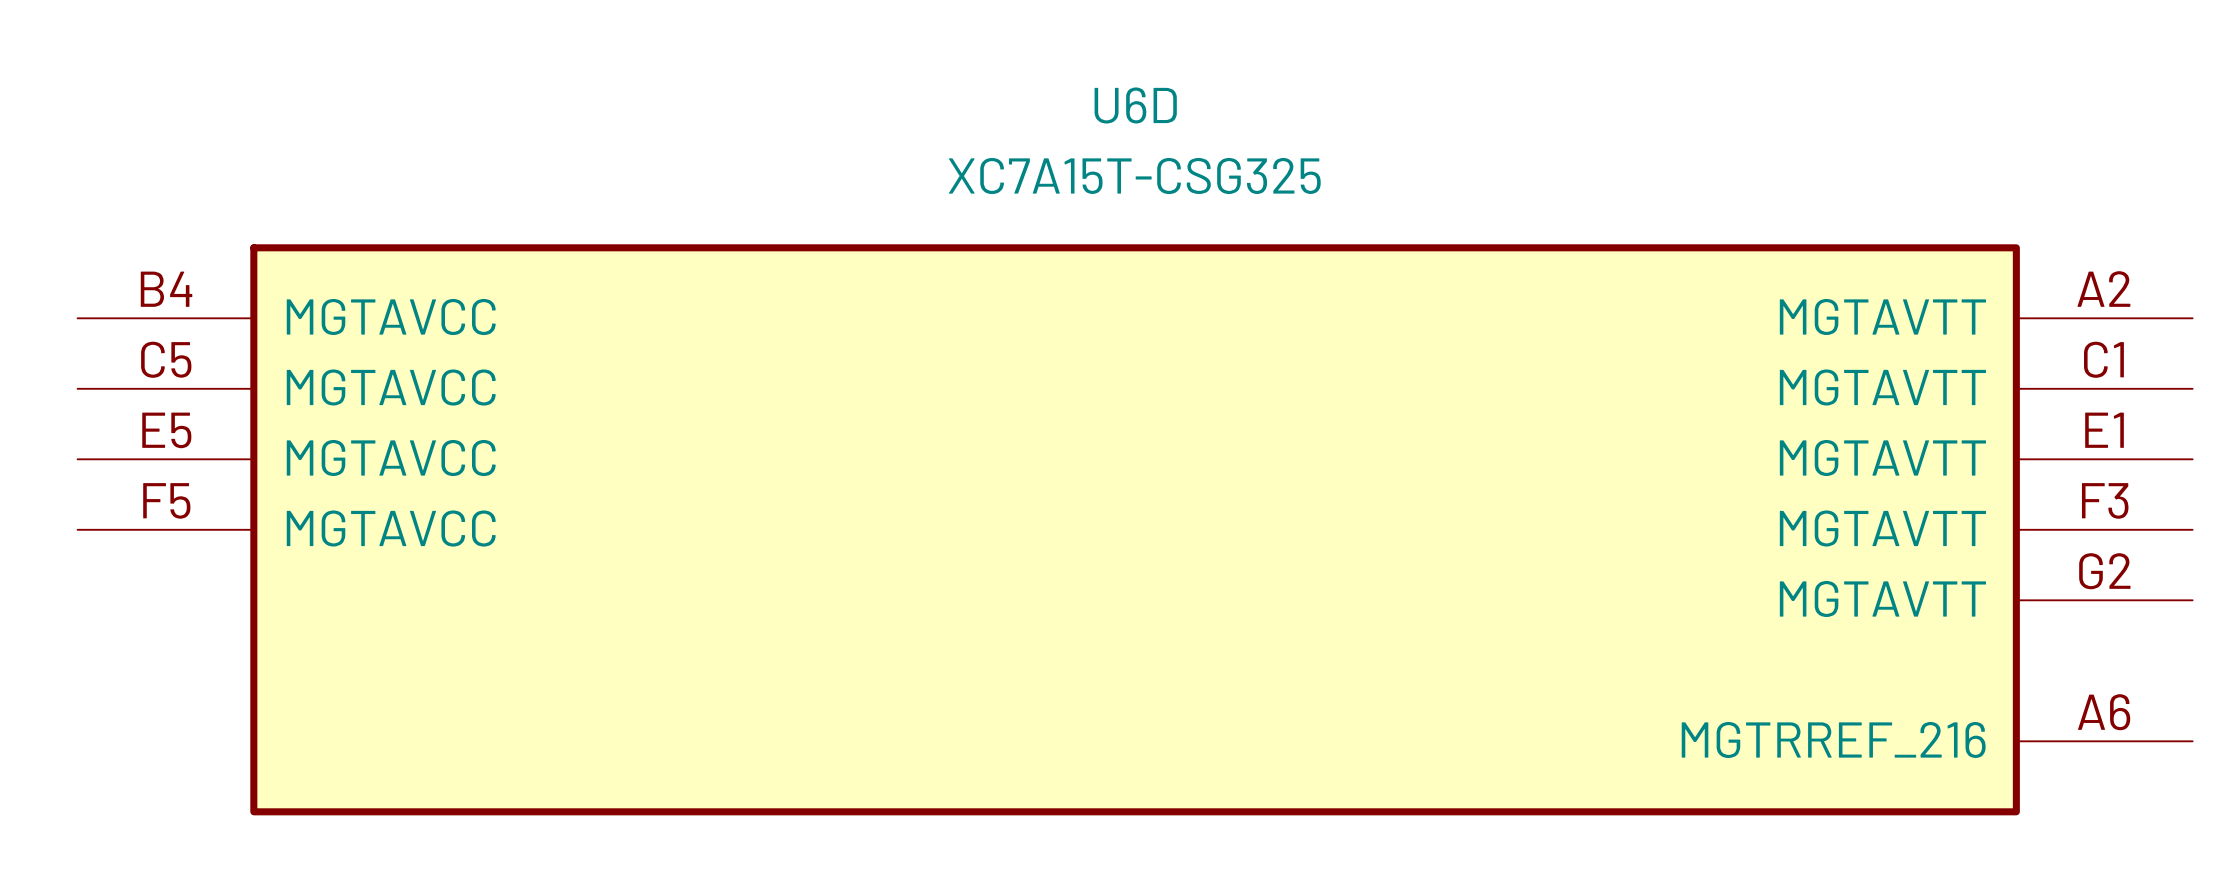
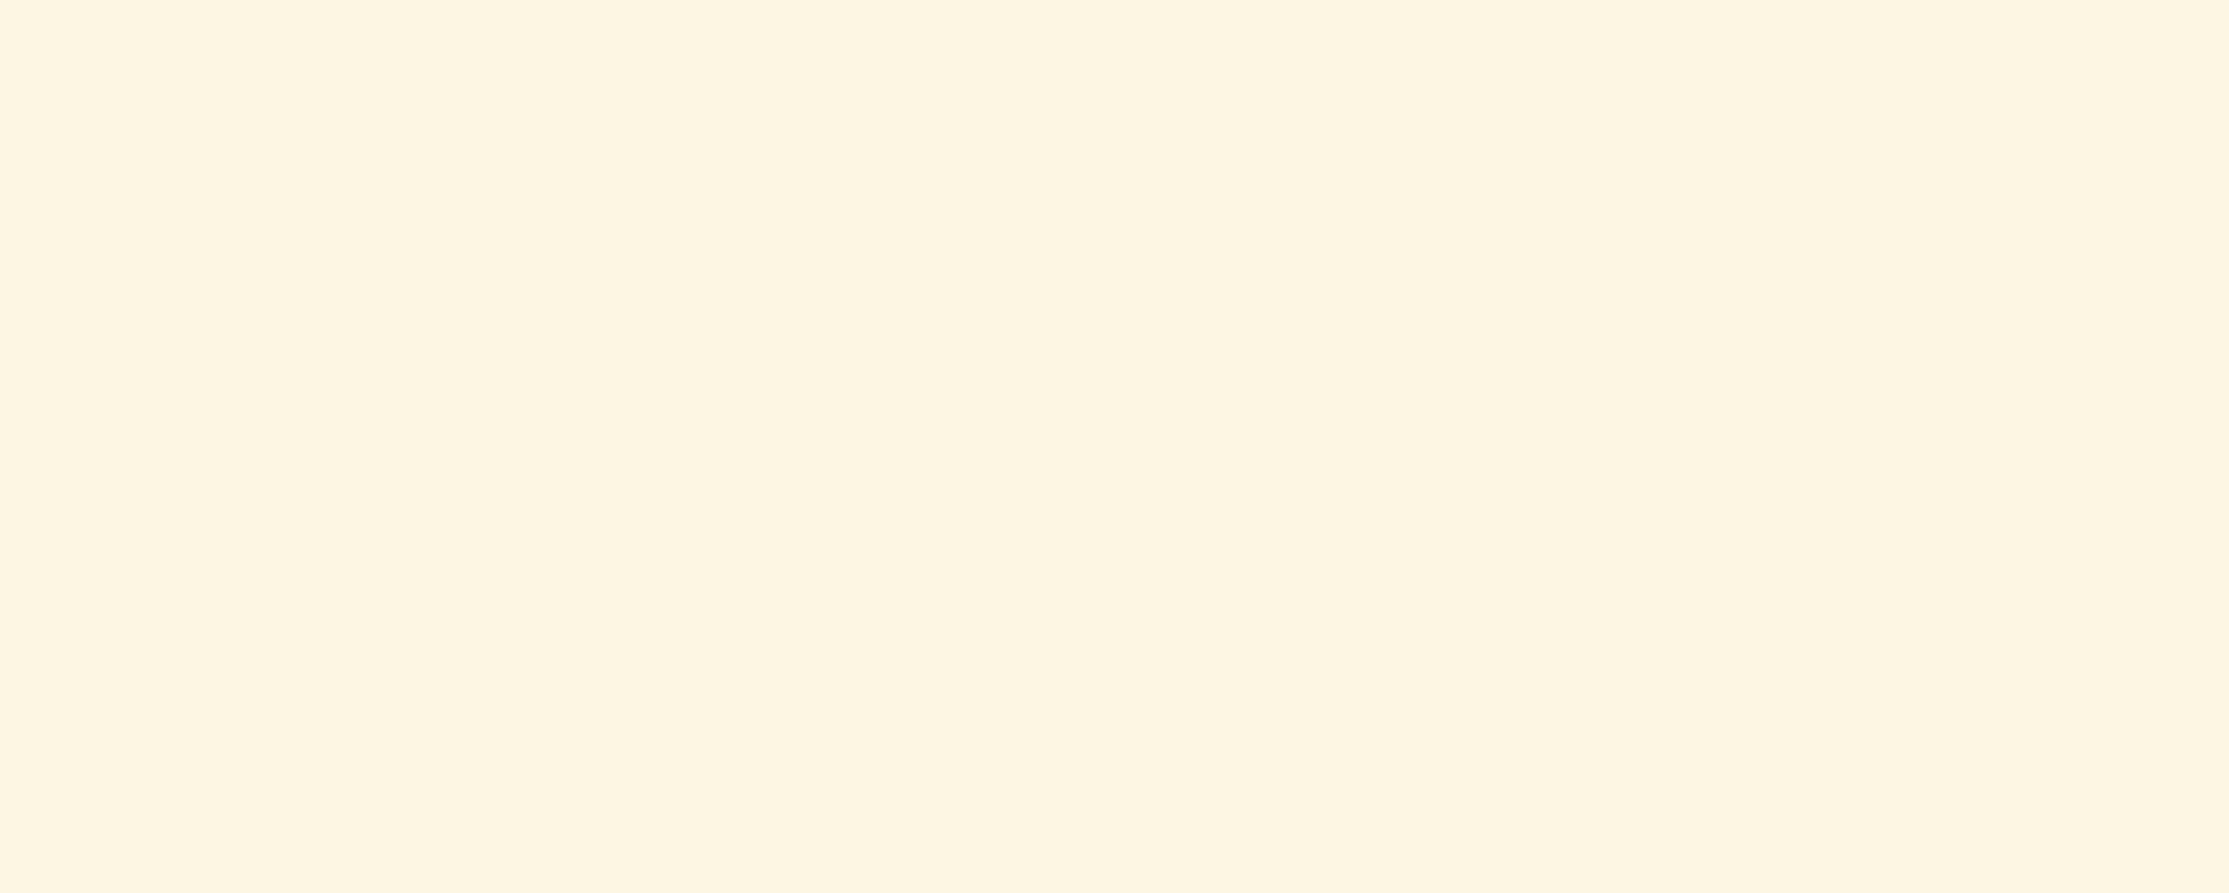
U6D: XC7A15T-CSG325 (1135, 529) -> none

